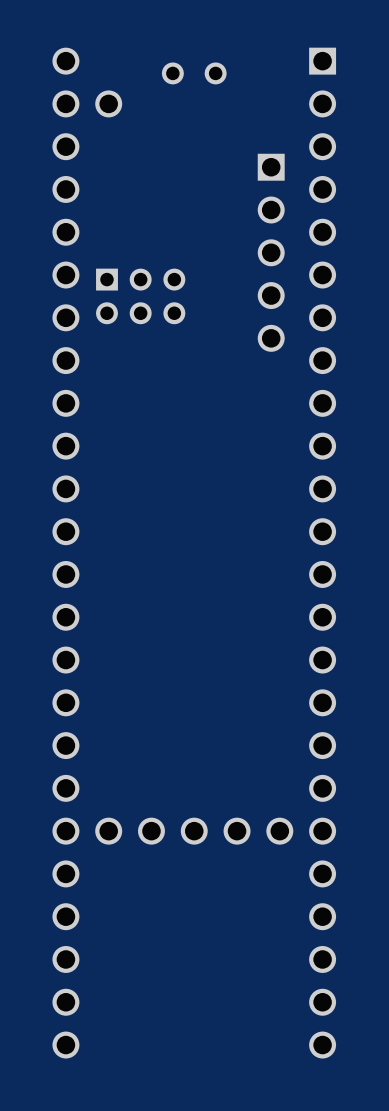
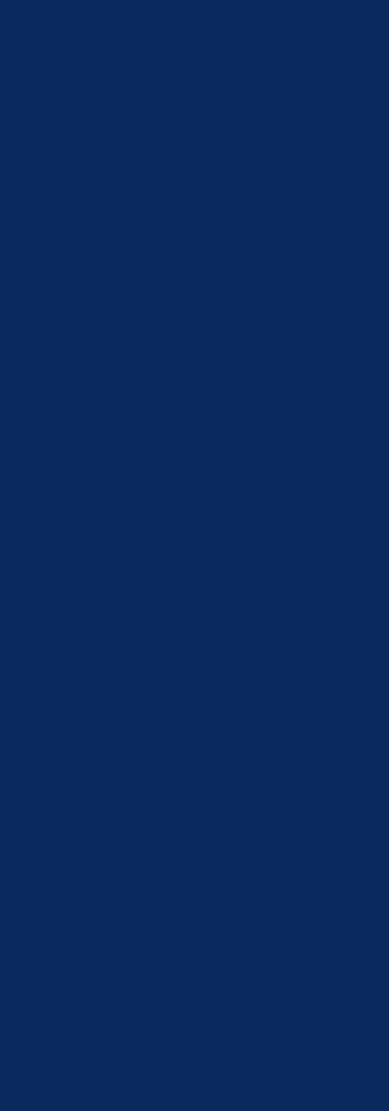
part: (194, 553) -> none

